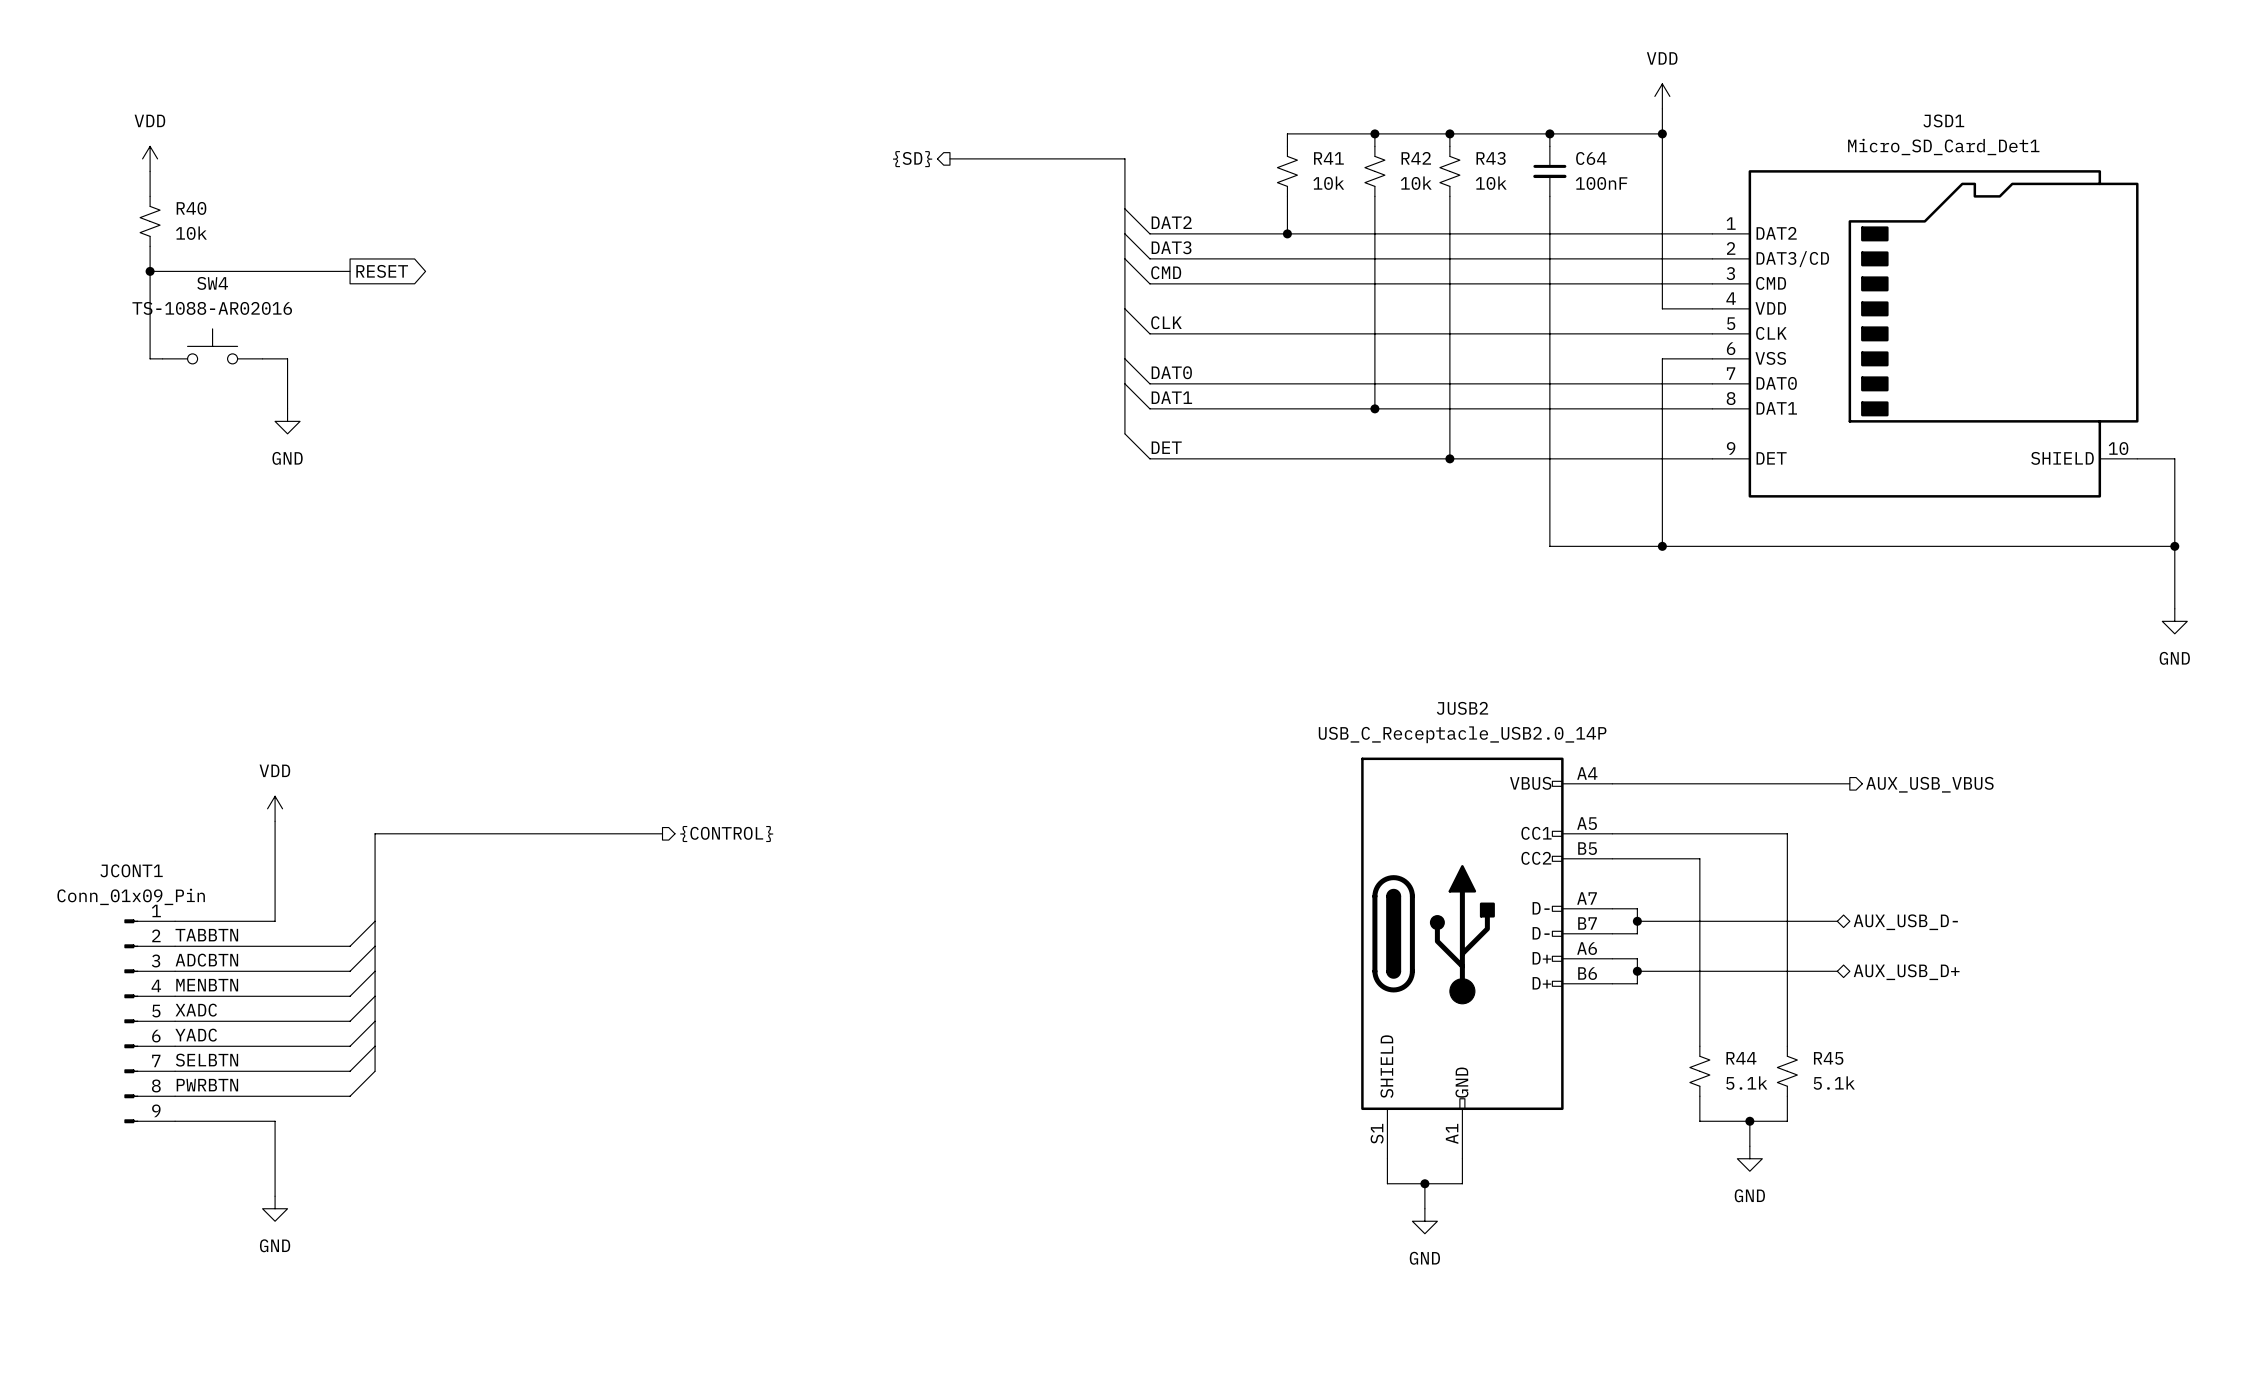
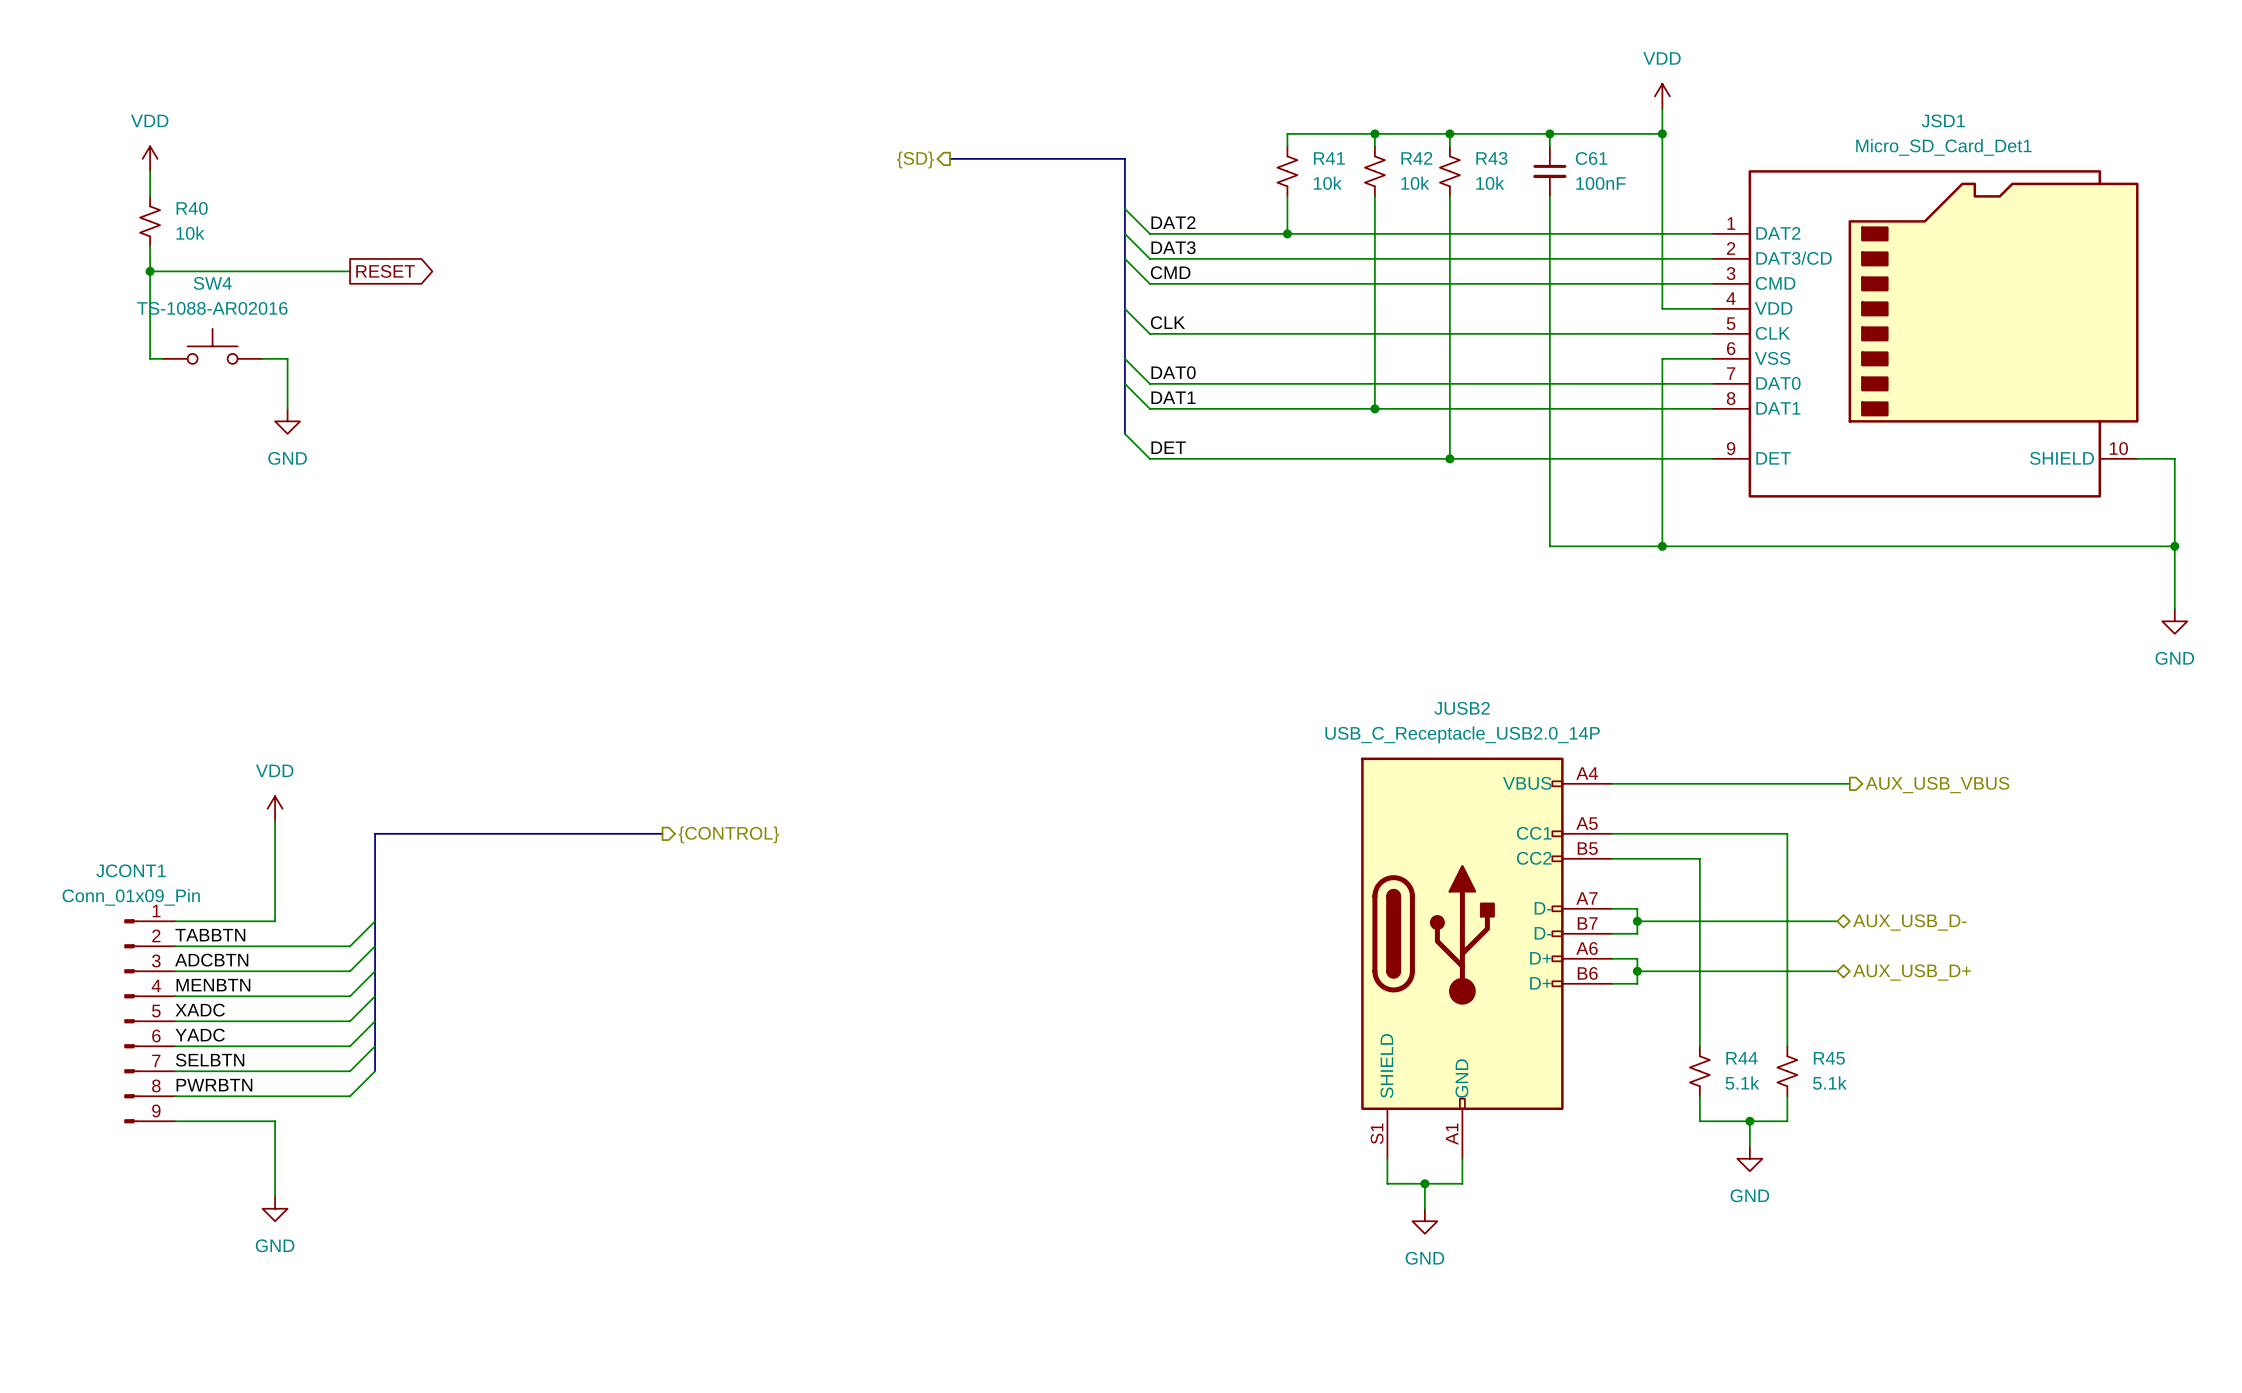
C64 name: C64 (1591, 158) -> C61 (1591, 158)

